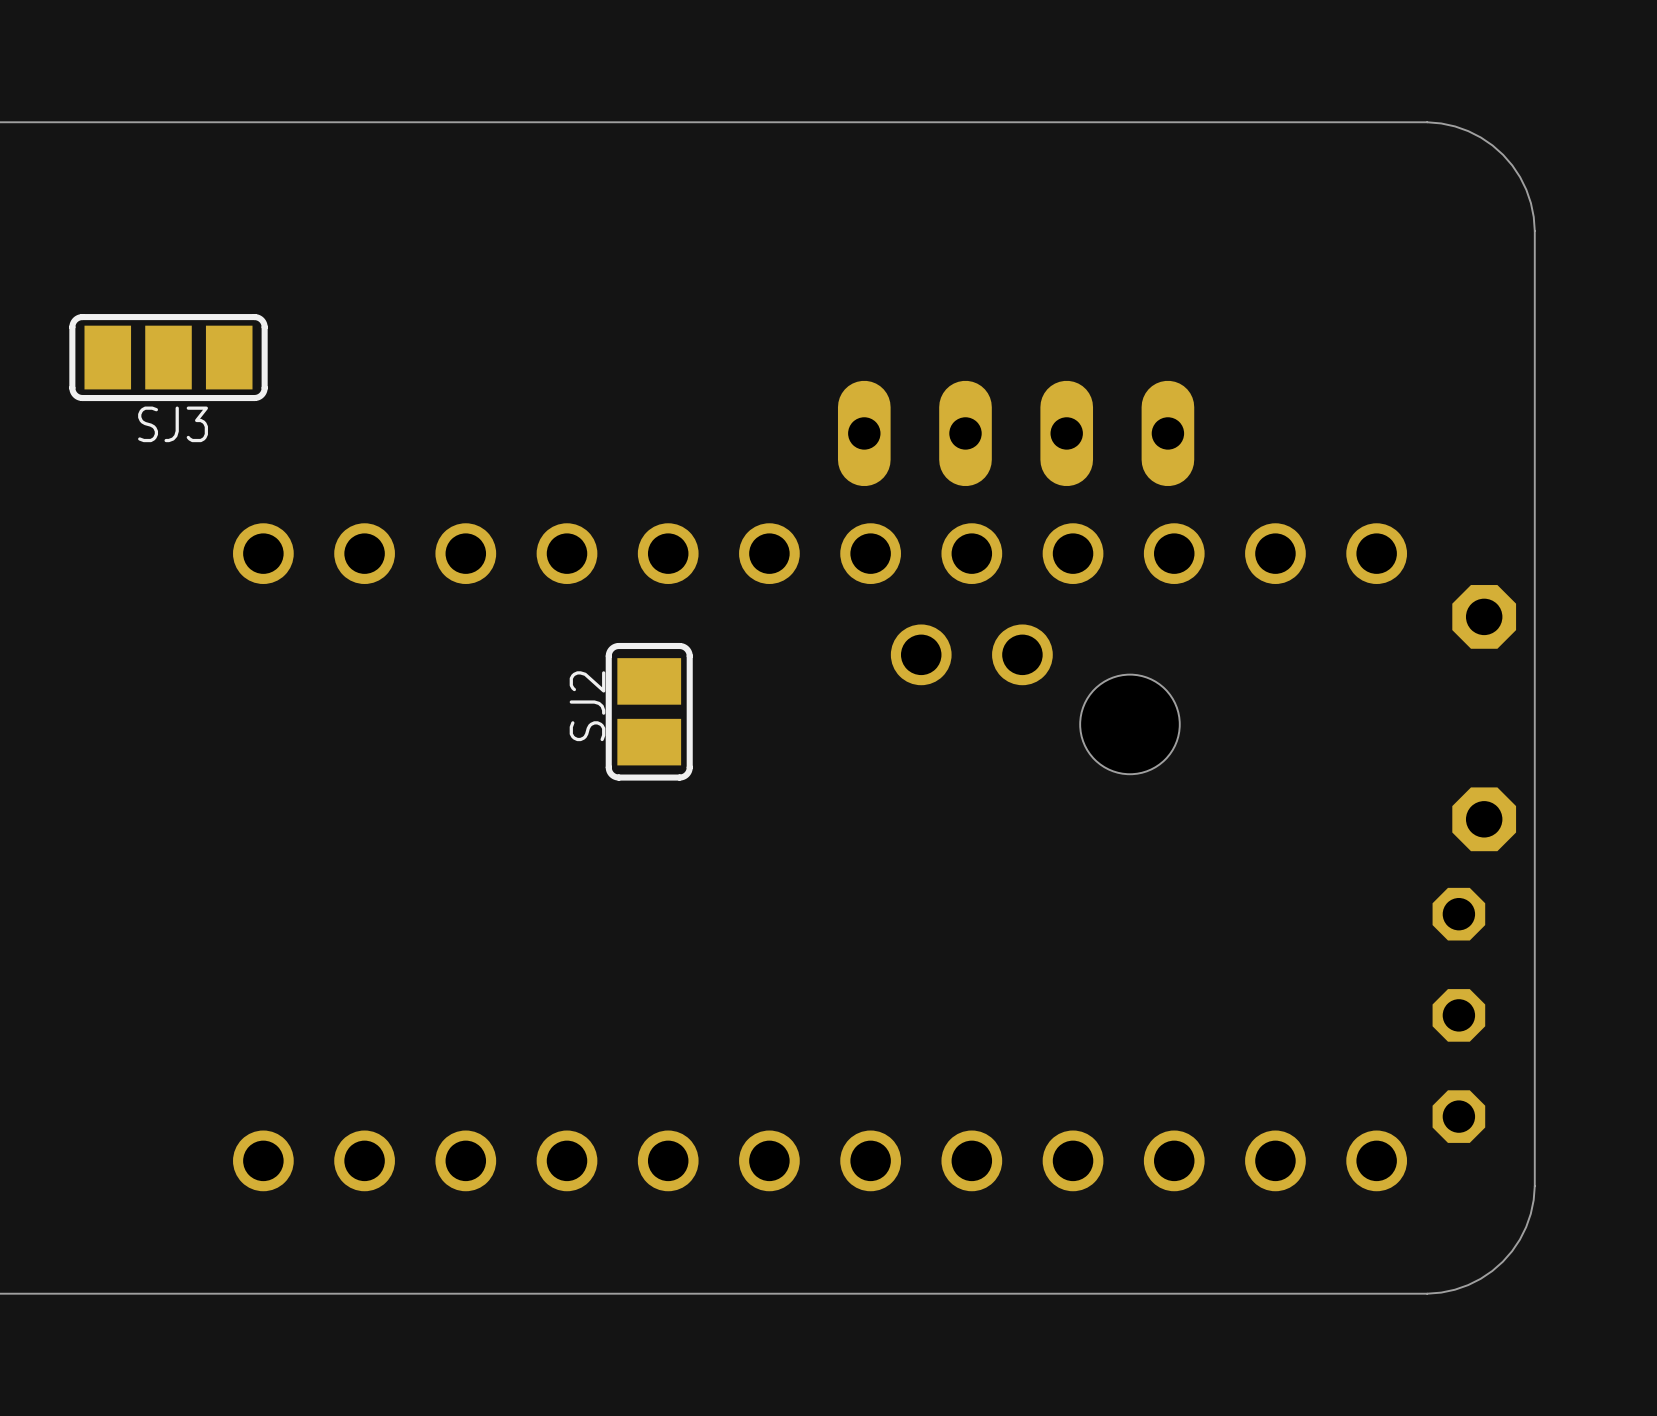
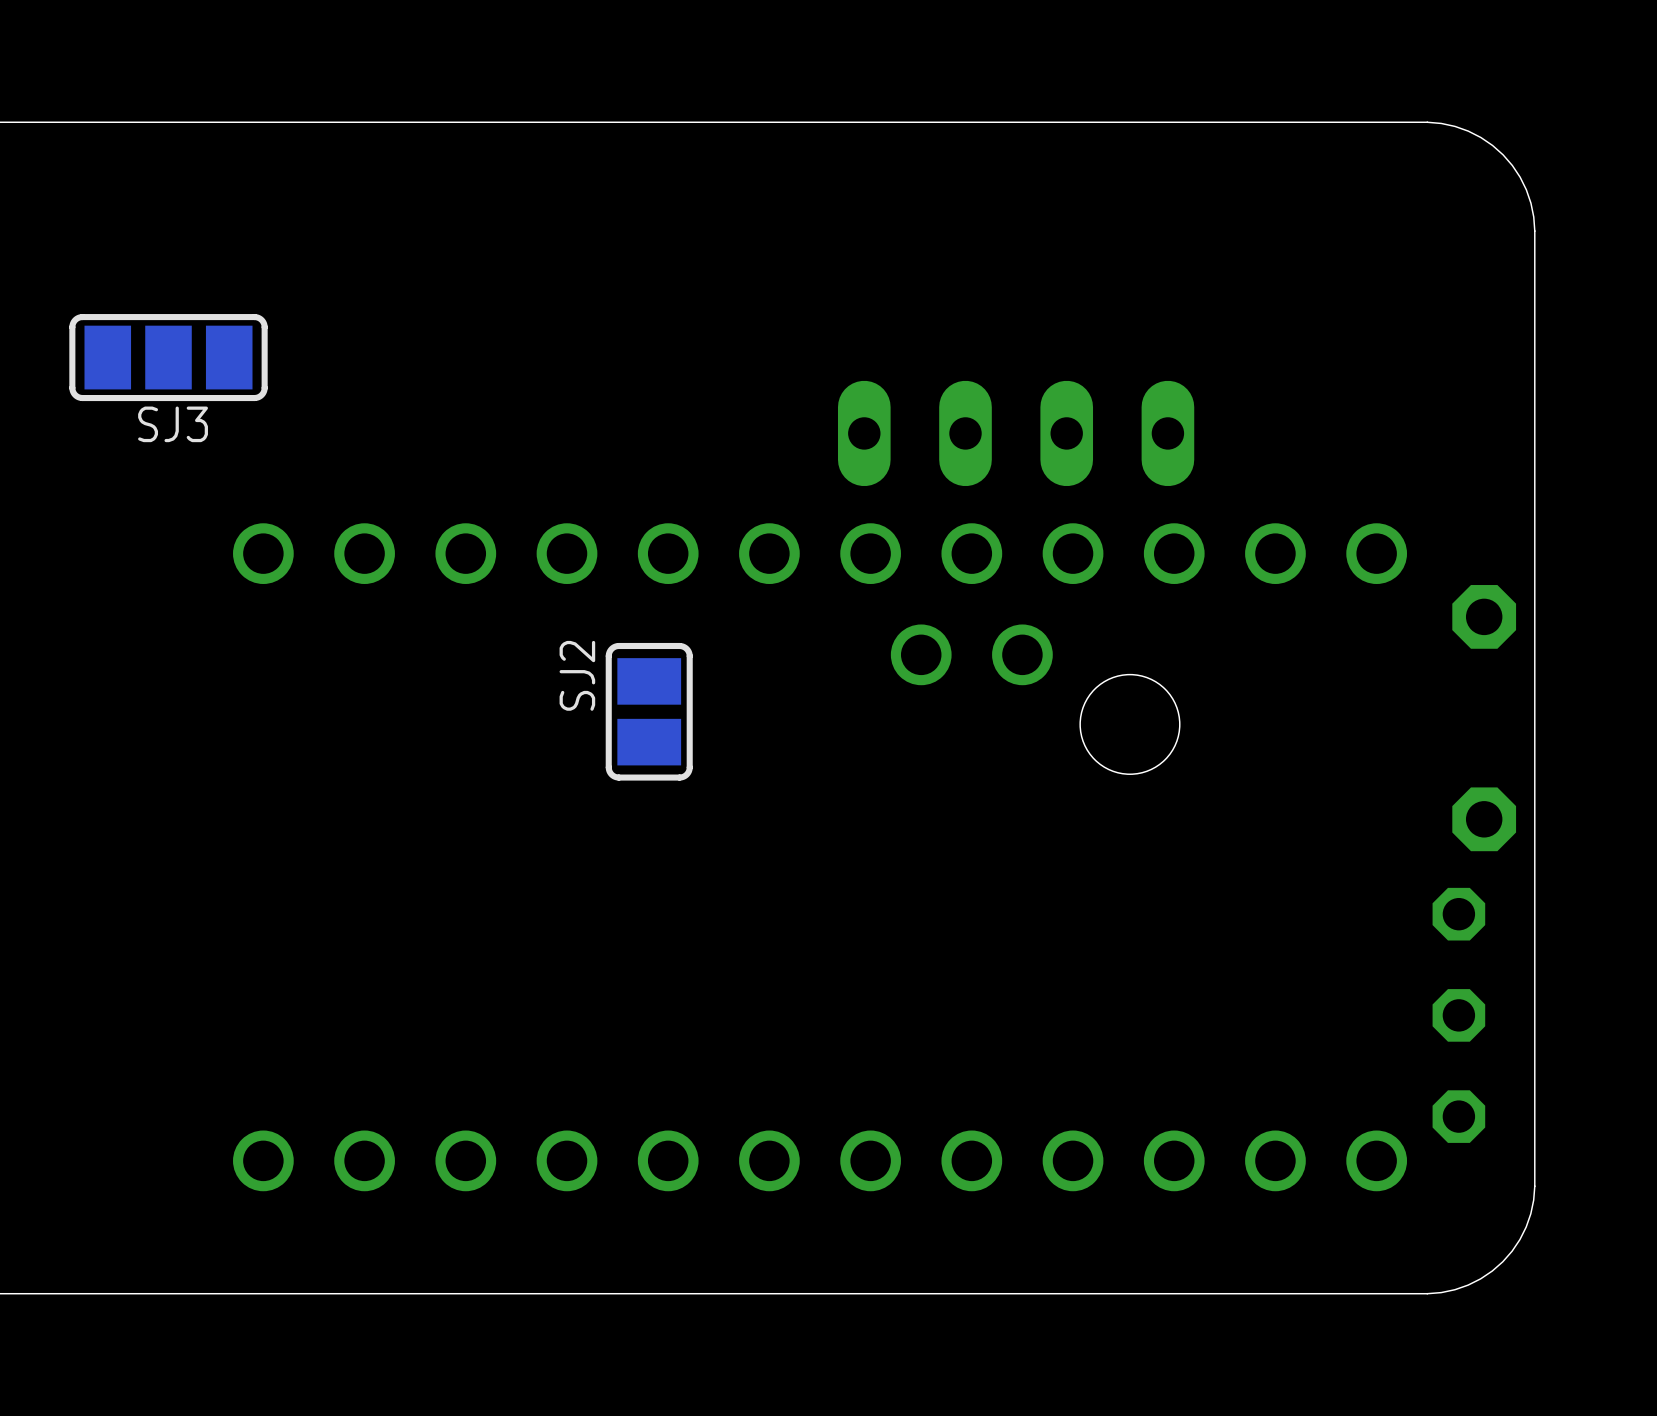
SJ2 name position: SJ2 (587, 706) -> SJ2 (577, 675)

